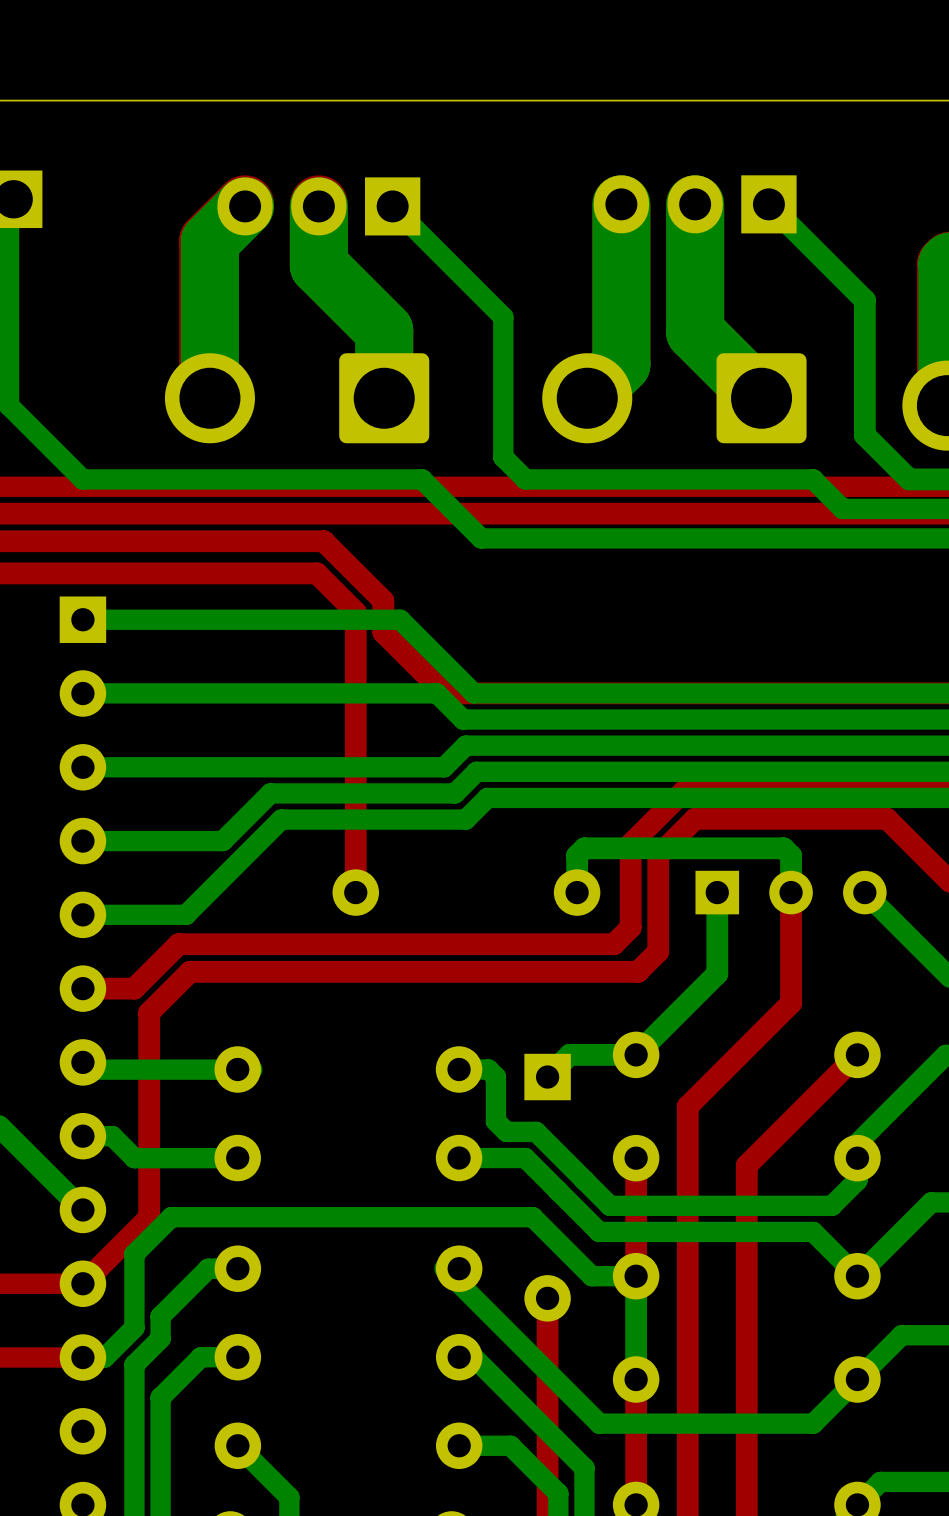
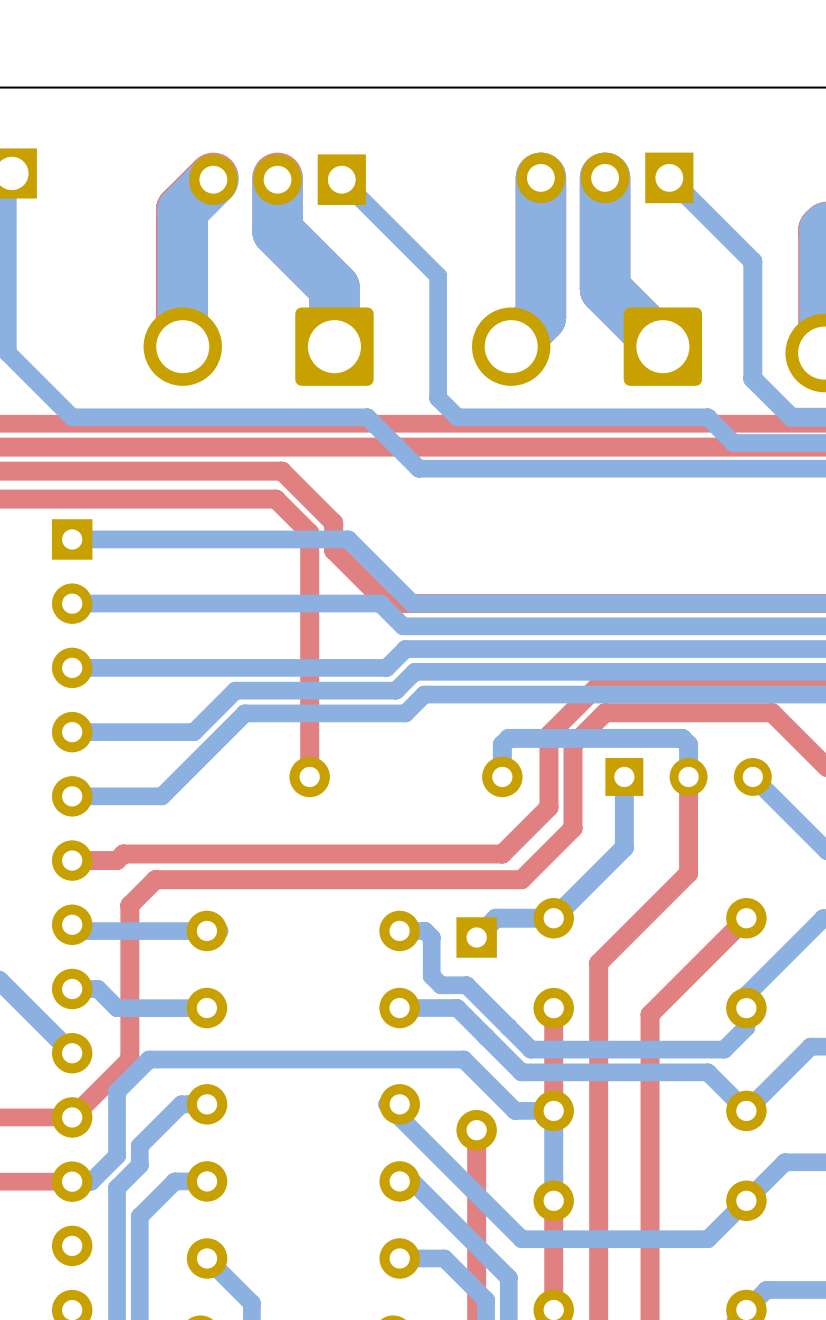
top track: (613, 944) (178, 944) (141, 981) -> (534, 821) (502, 854) (123, 854)
top track: (638, 971) (190, 971) (149, 1012) (149, 1040) -> (555, 845) (521, 879) (155, 879) (129, 905)

